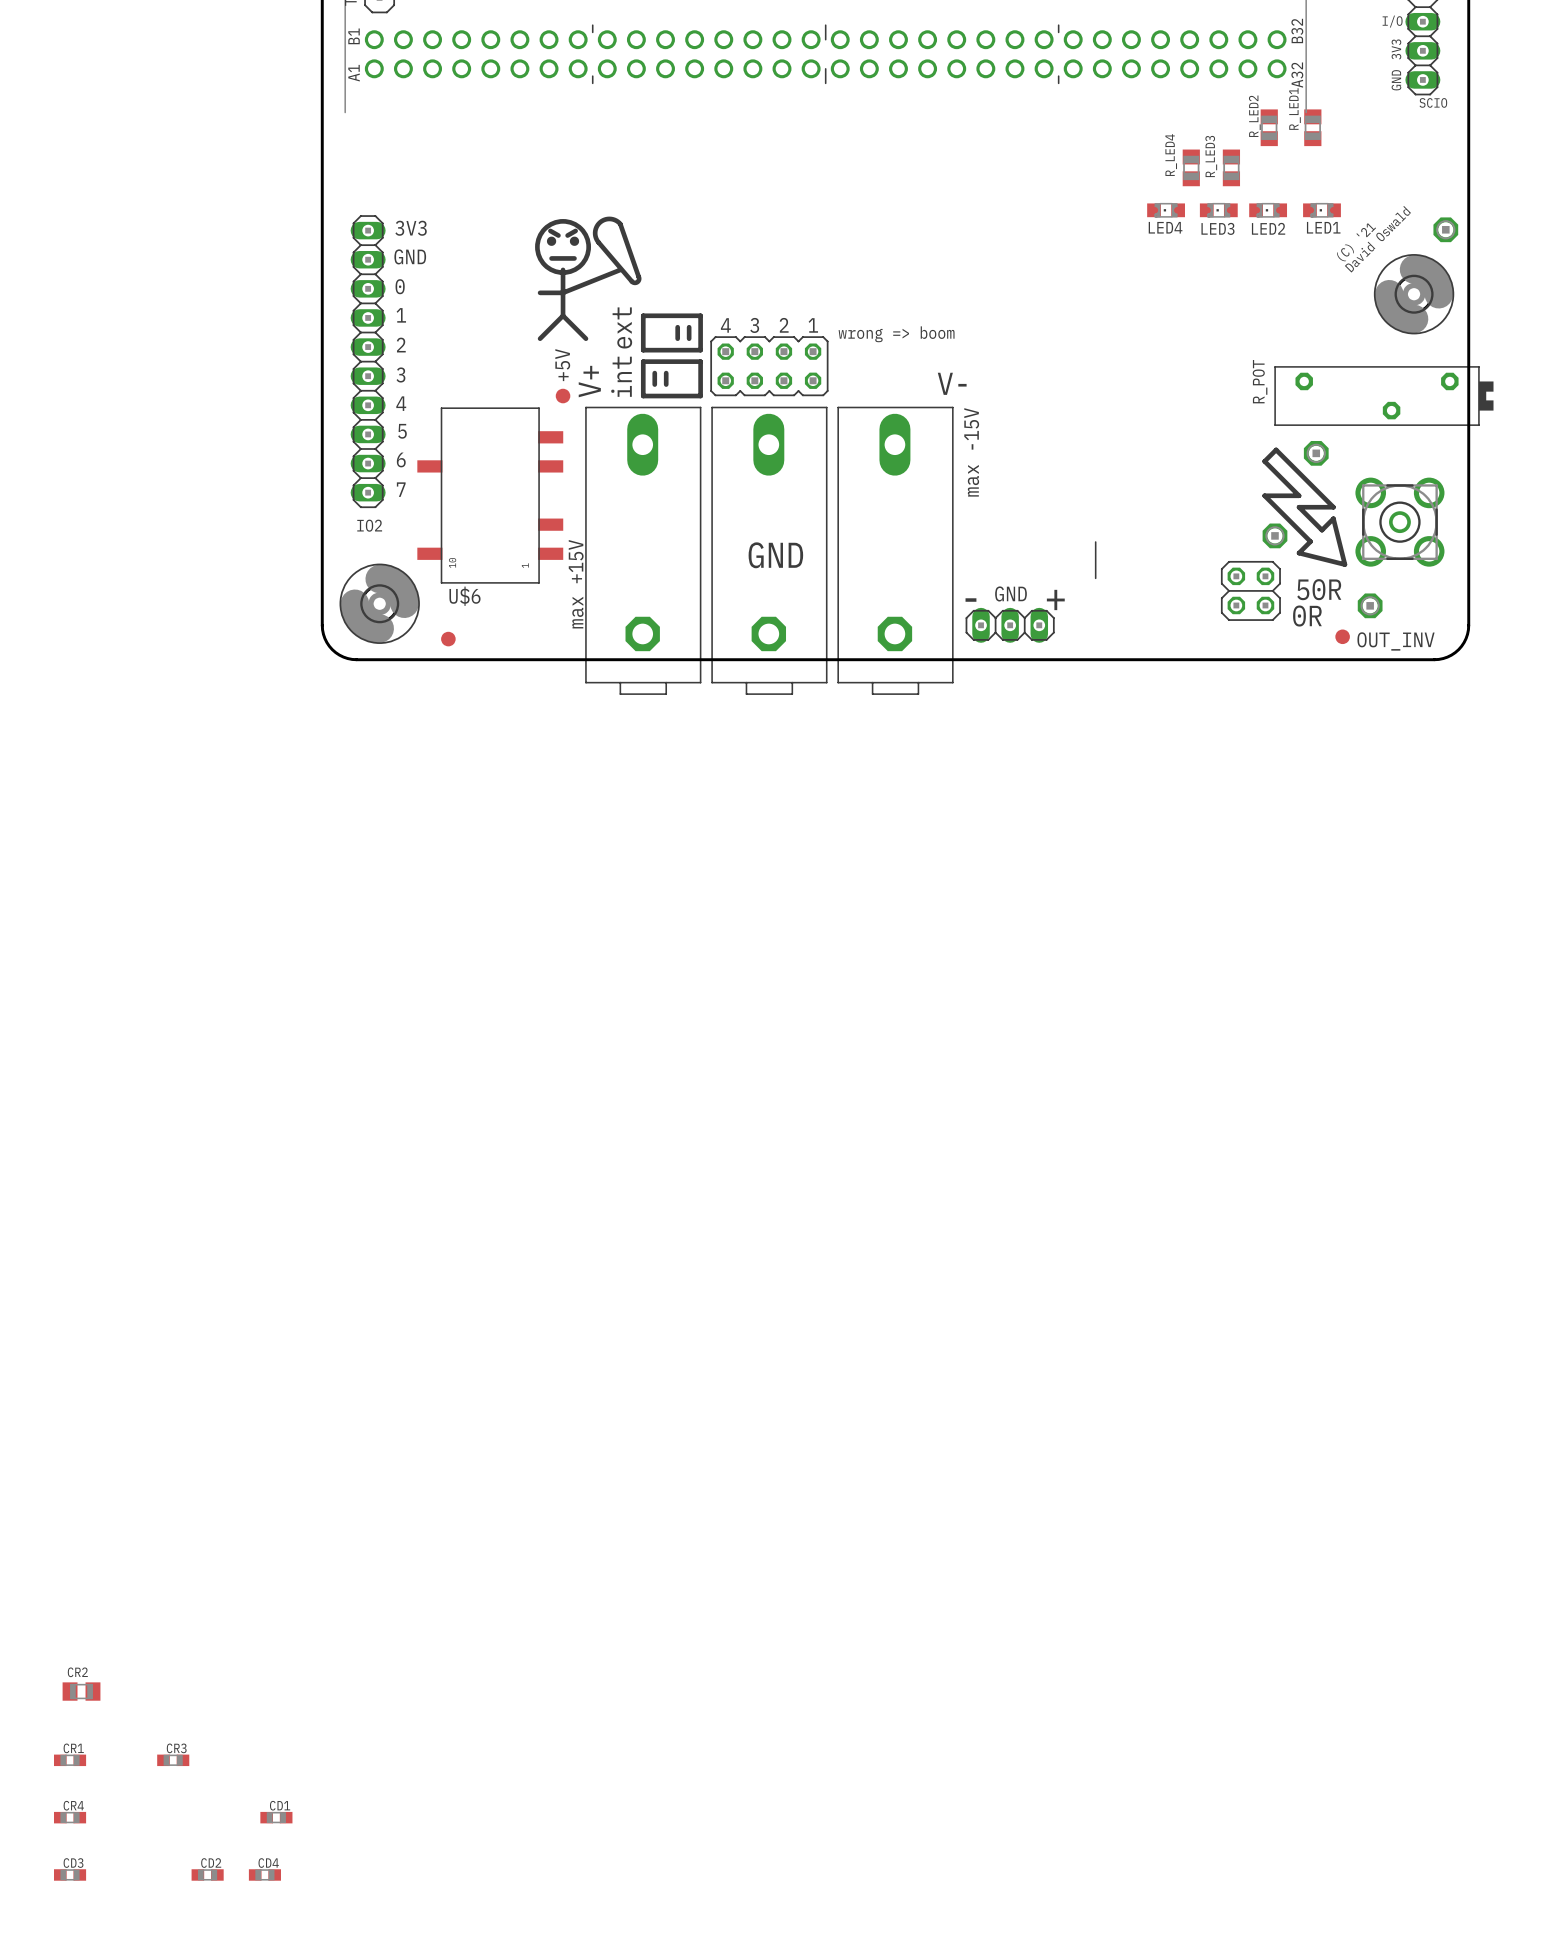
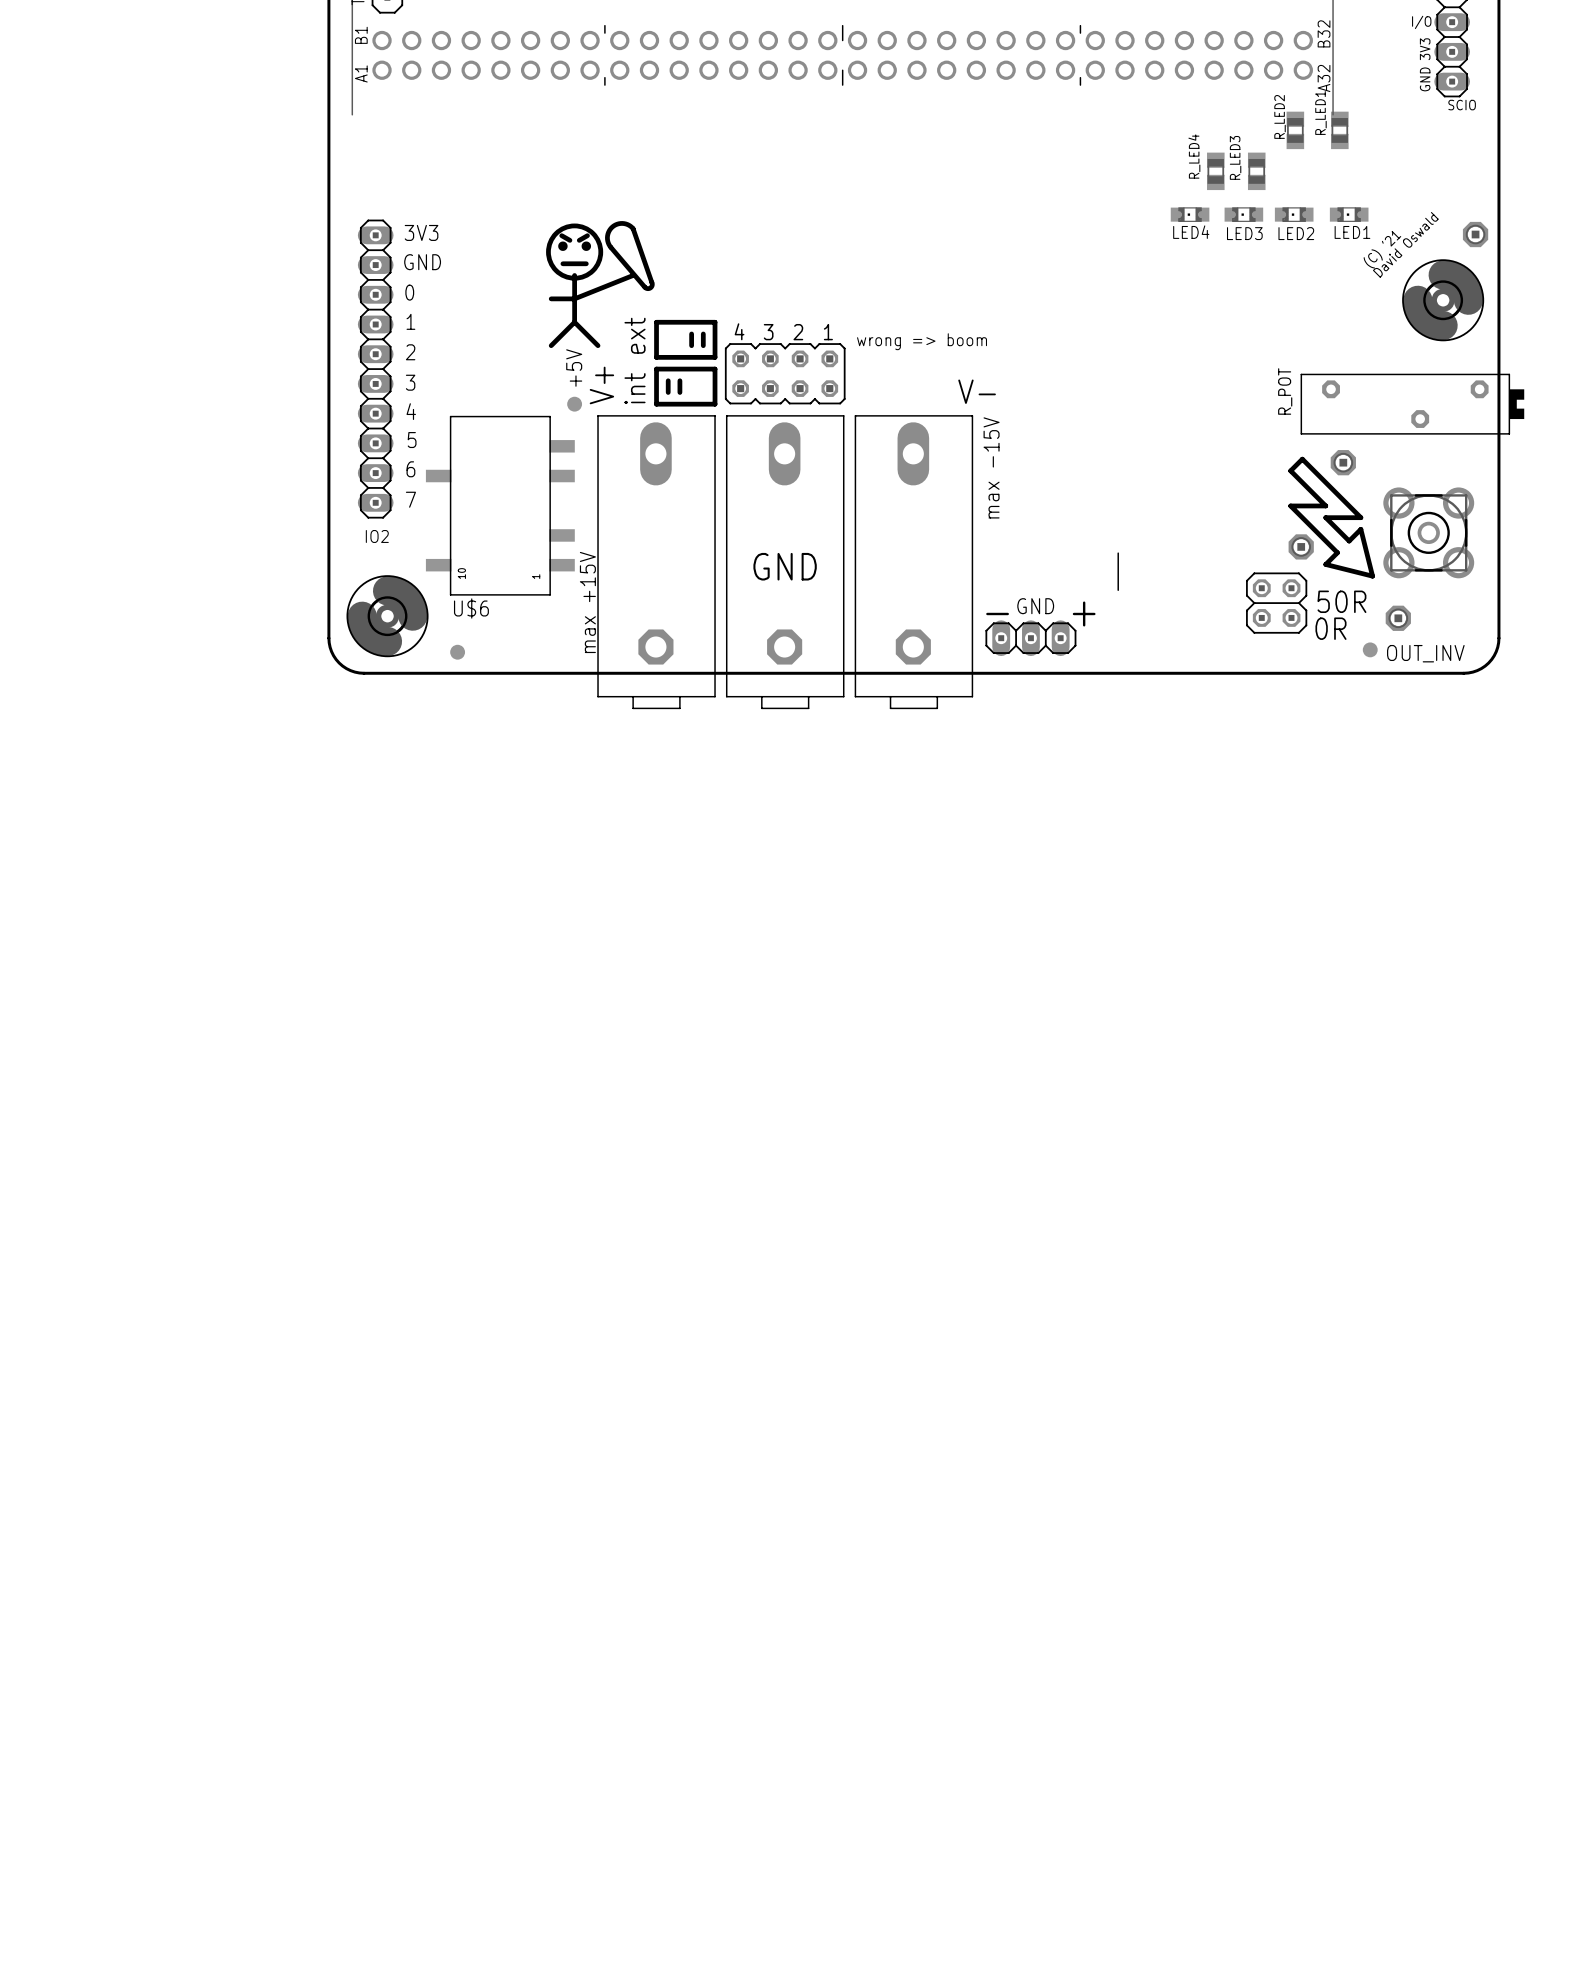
CR2: (81, 1691) -> none
CR1: (70, 1760) -> none
CR3: (173, 1760) -> none
CR4: (70, 1817) -> none
CD1: (276, 1817) -> none
CD3: (70, 1874) -> none
CD2: (207, 1874) -> none
CD4: (264, 1874) -> none

